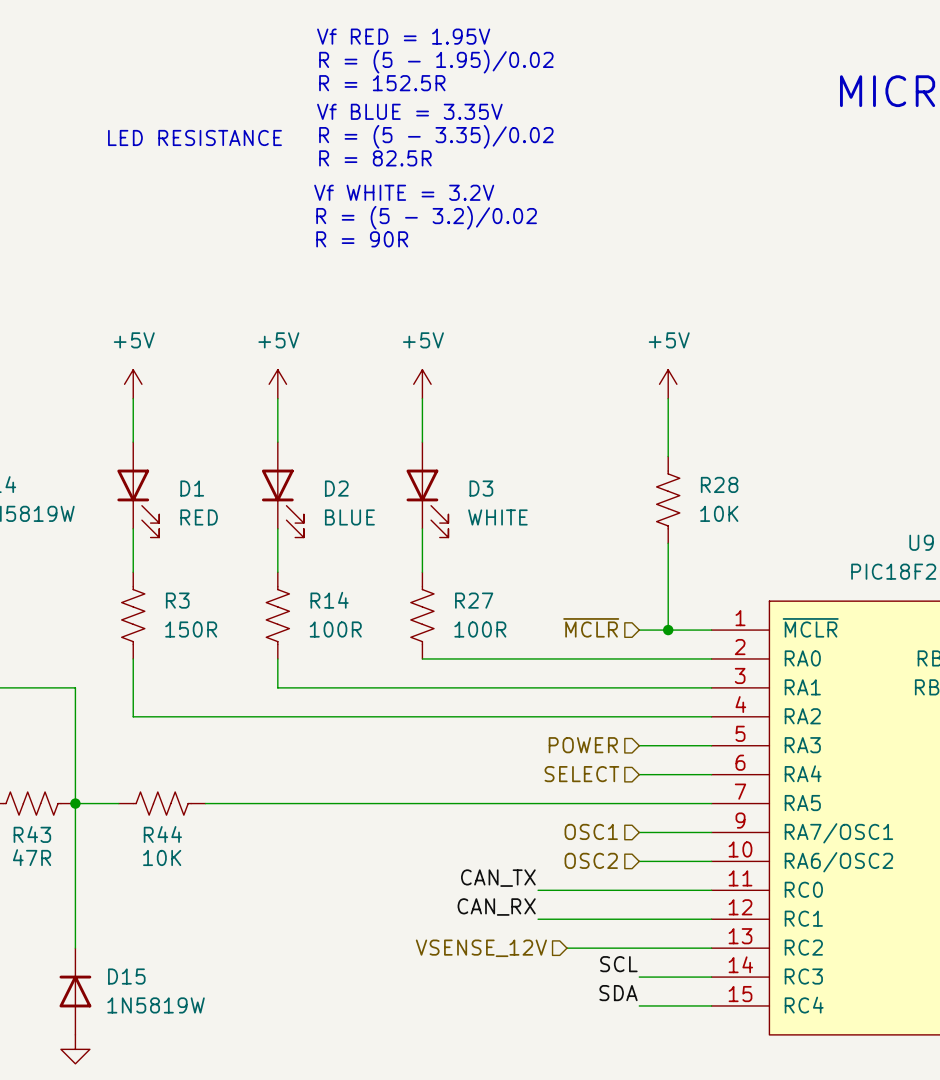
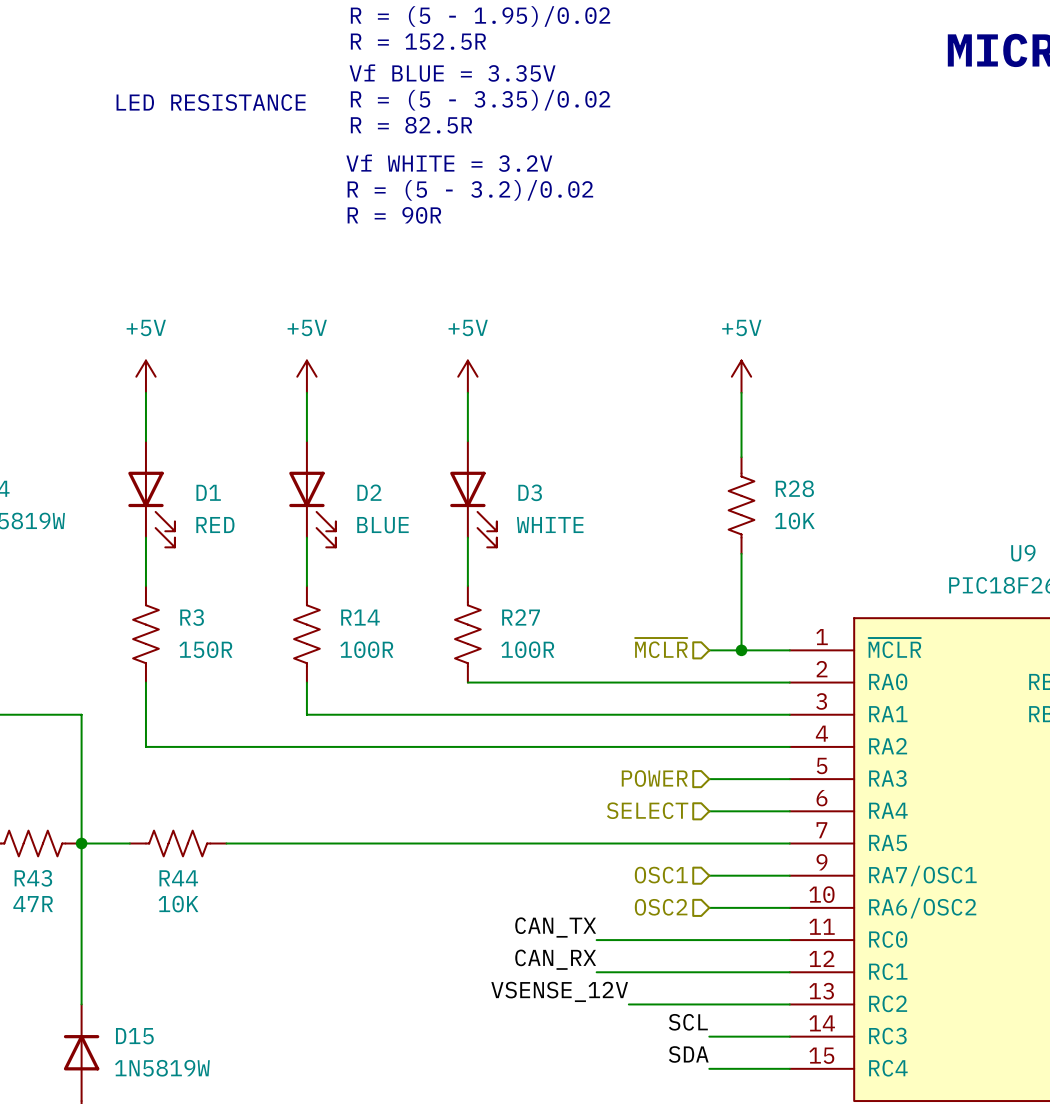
label: none -> VSENSE_12V (559, 991)
hierarchical label: VSENSE_12V (481, 948) -> none

